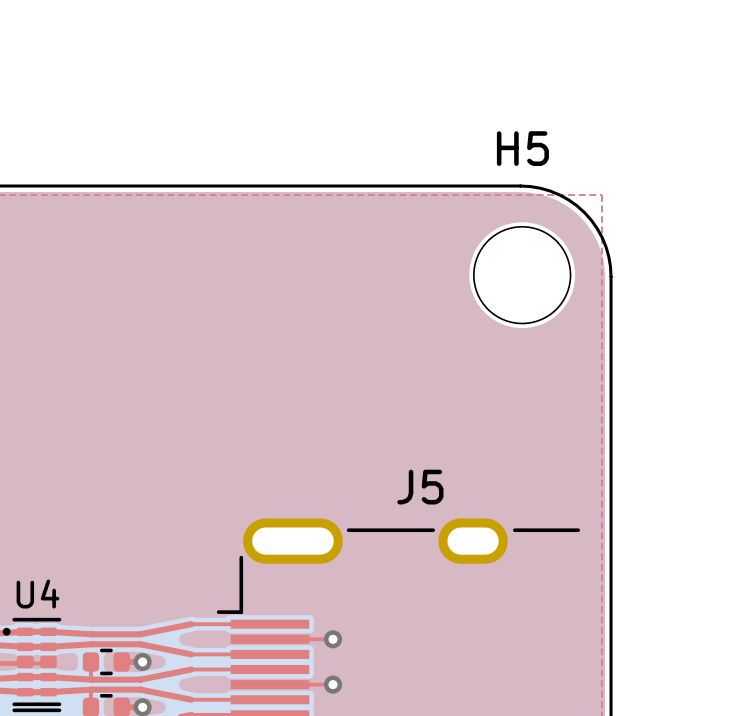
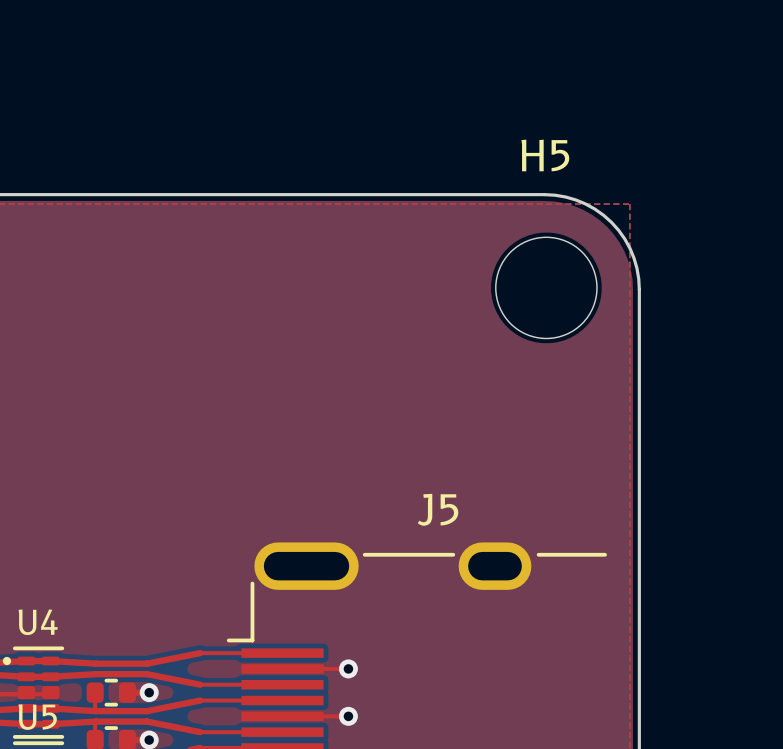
U5 name: none -> U5 (37, 717)

